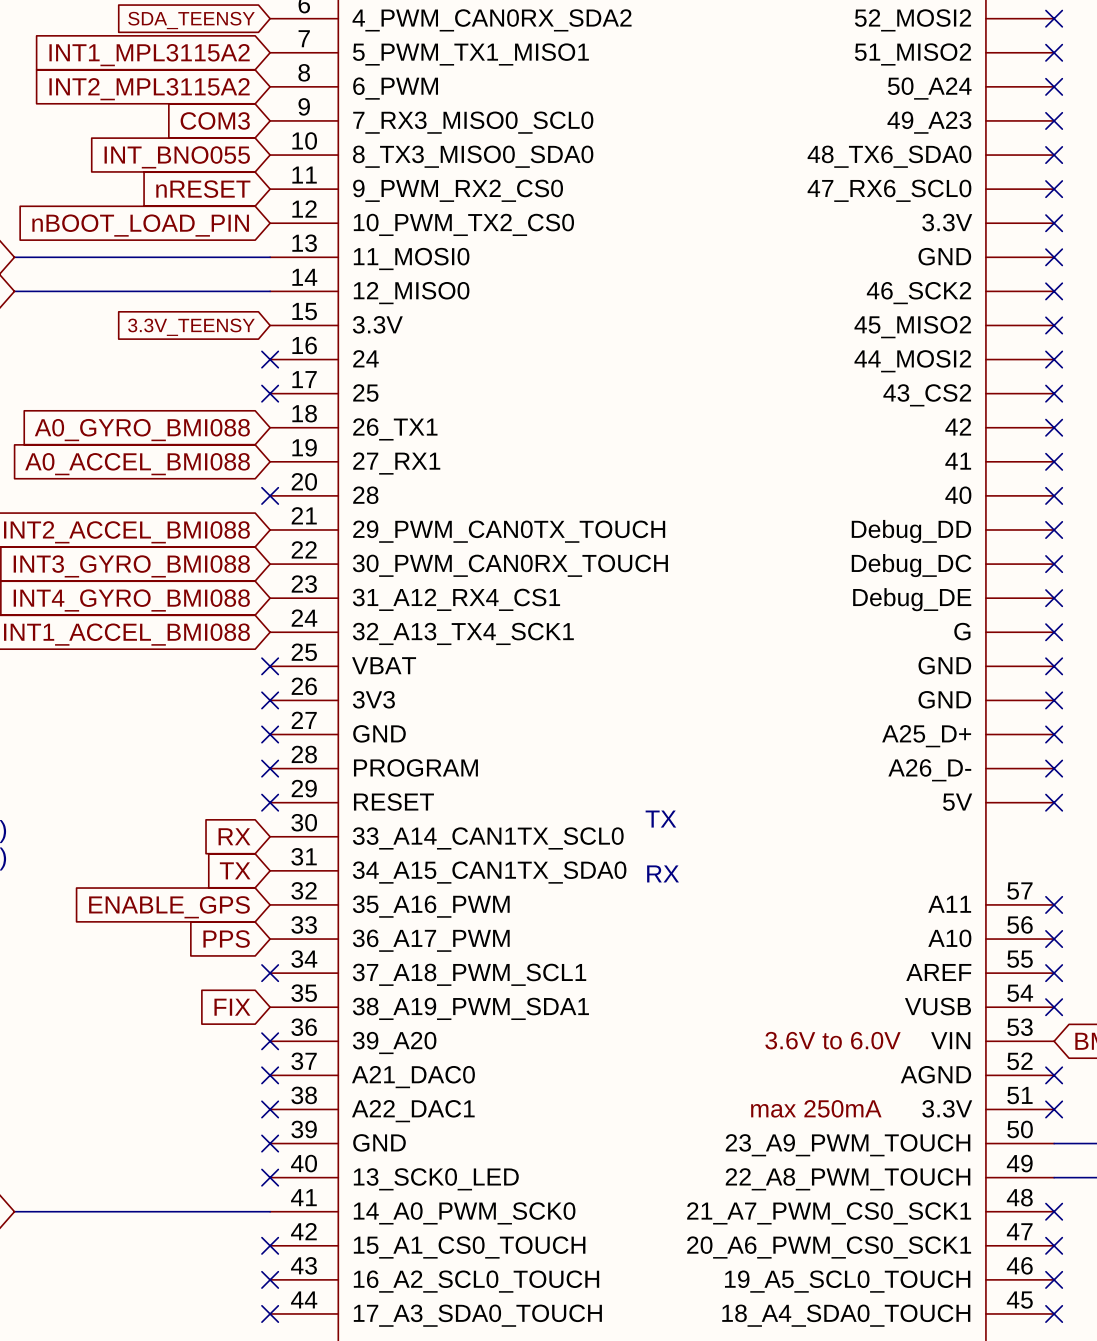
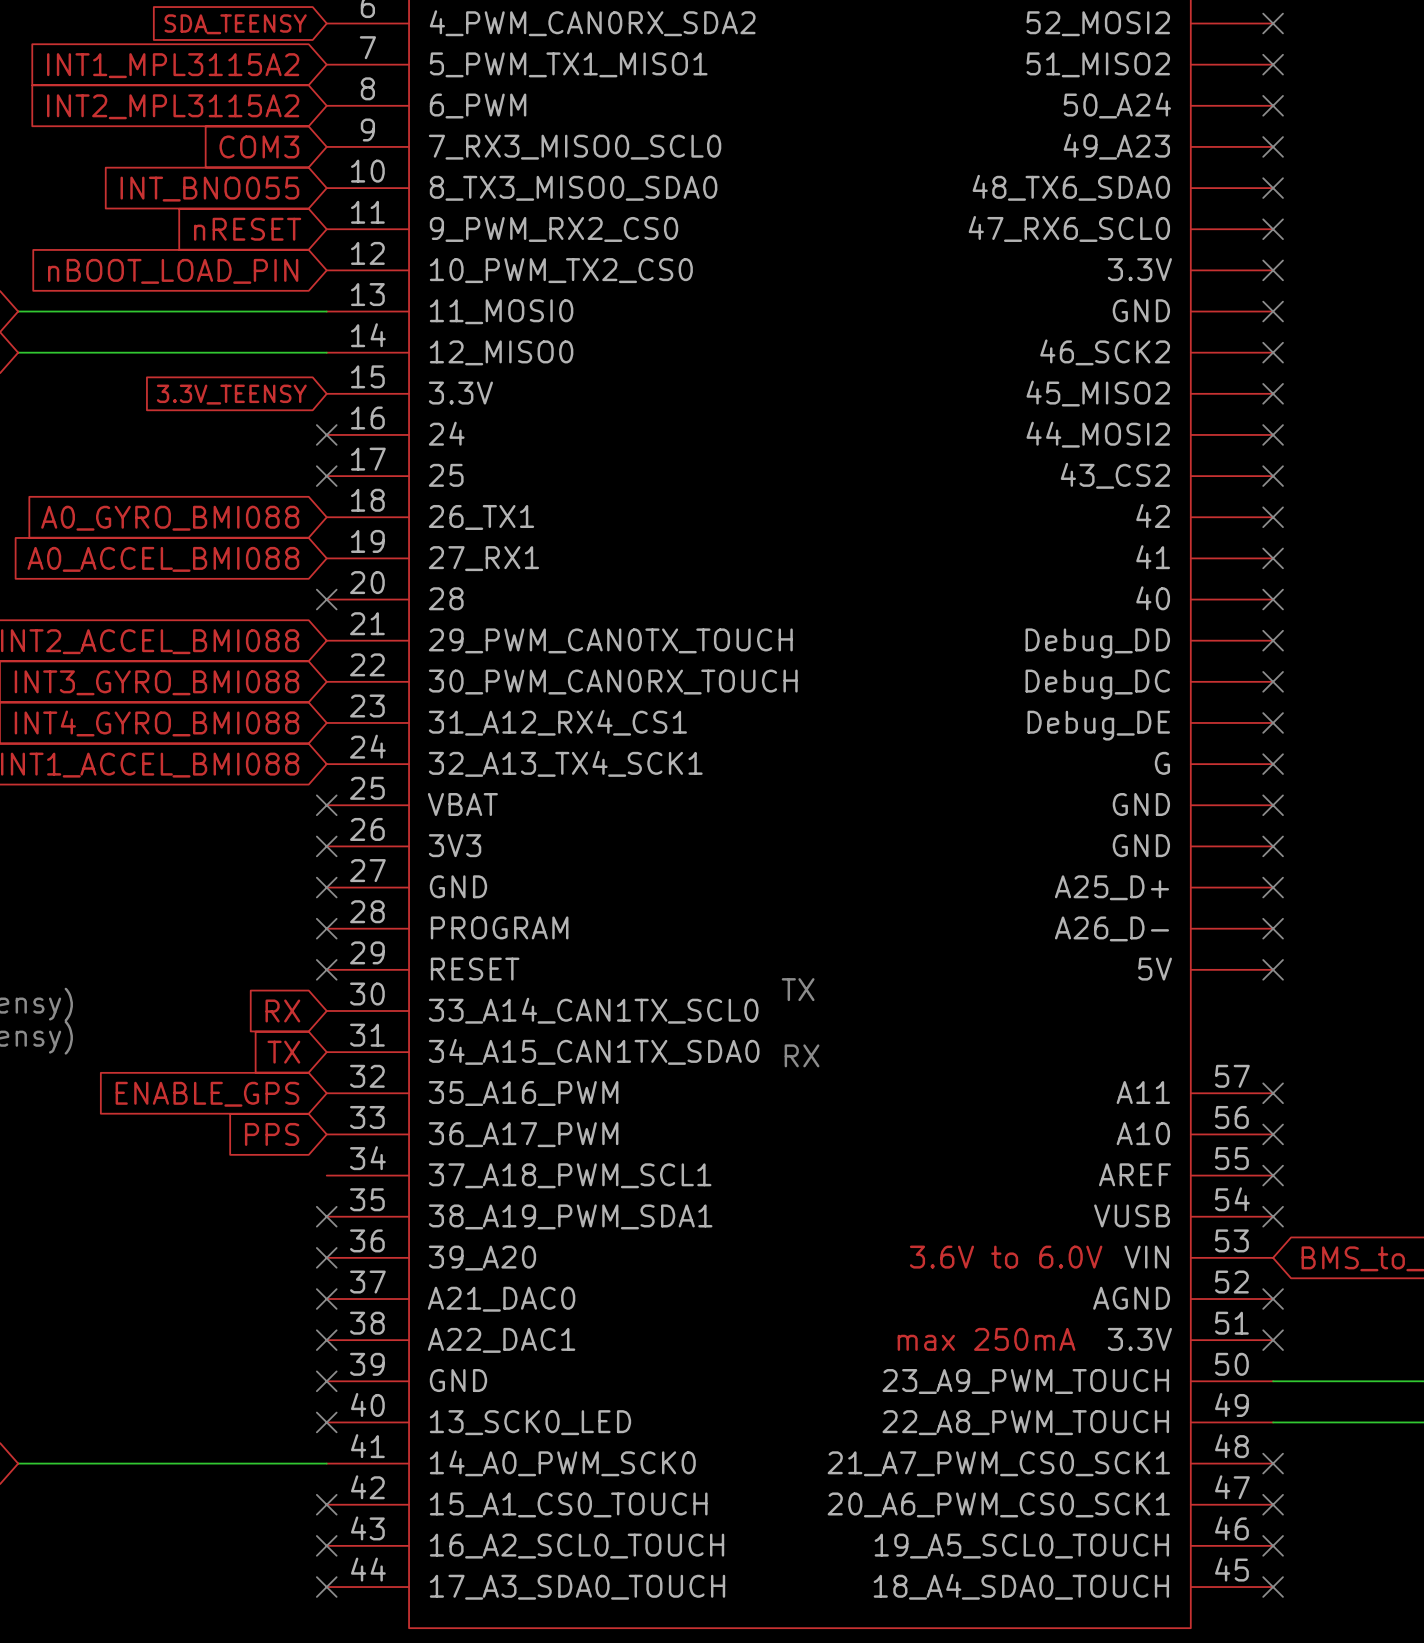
no-connect mark position: (270, 973) -> (326, 1216)
global label: FIX (232, 1007) -> none

